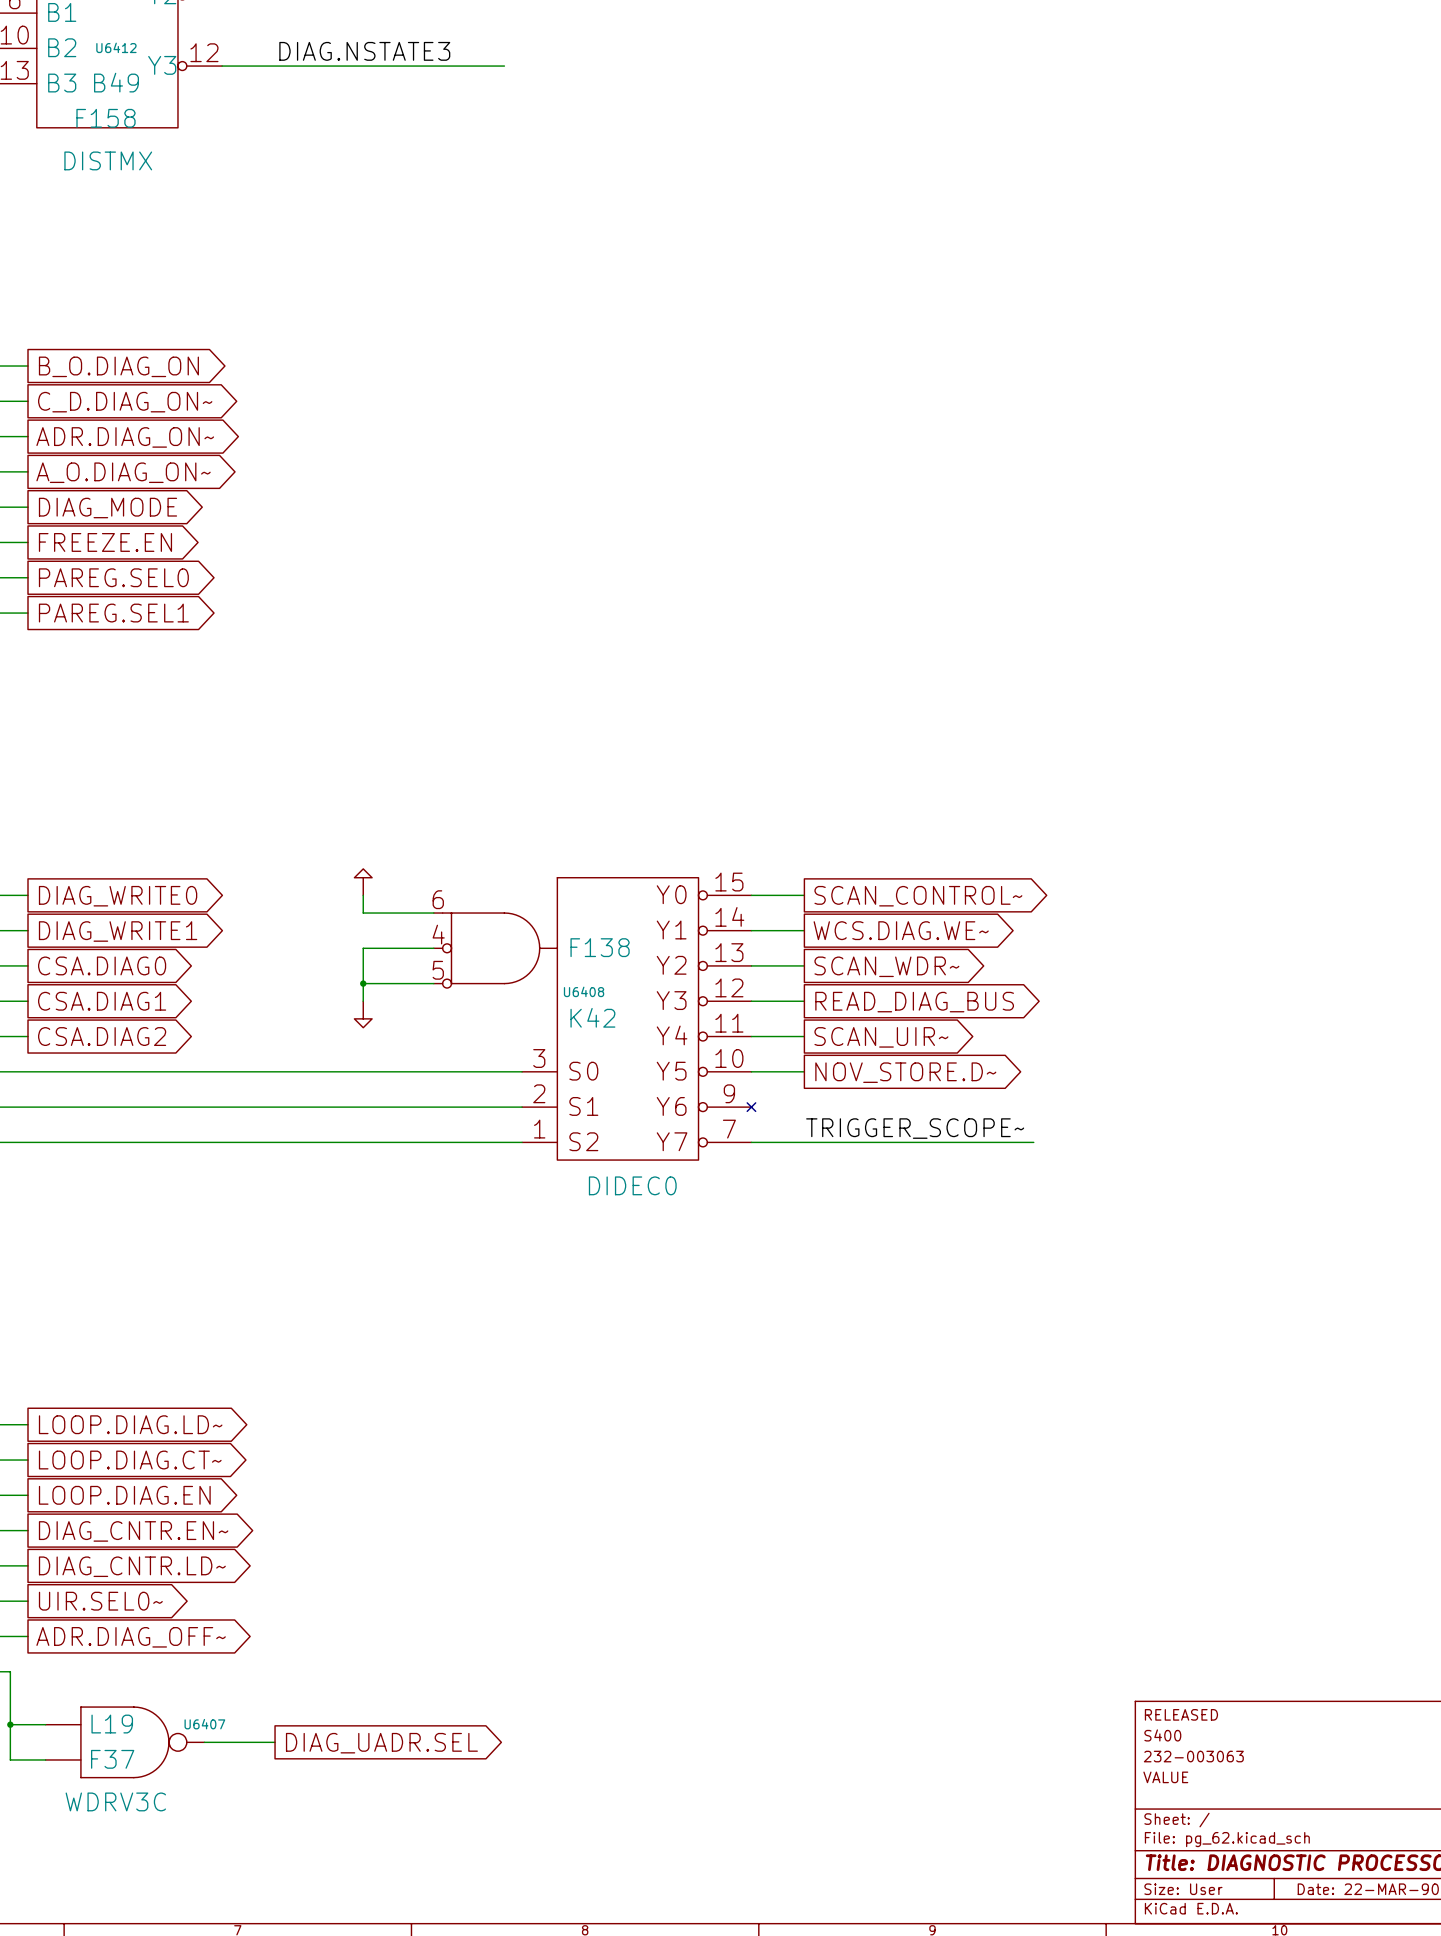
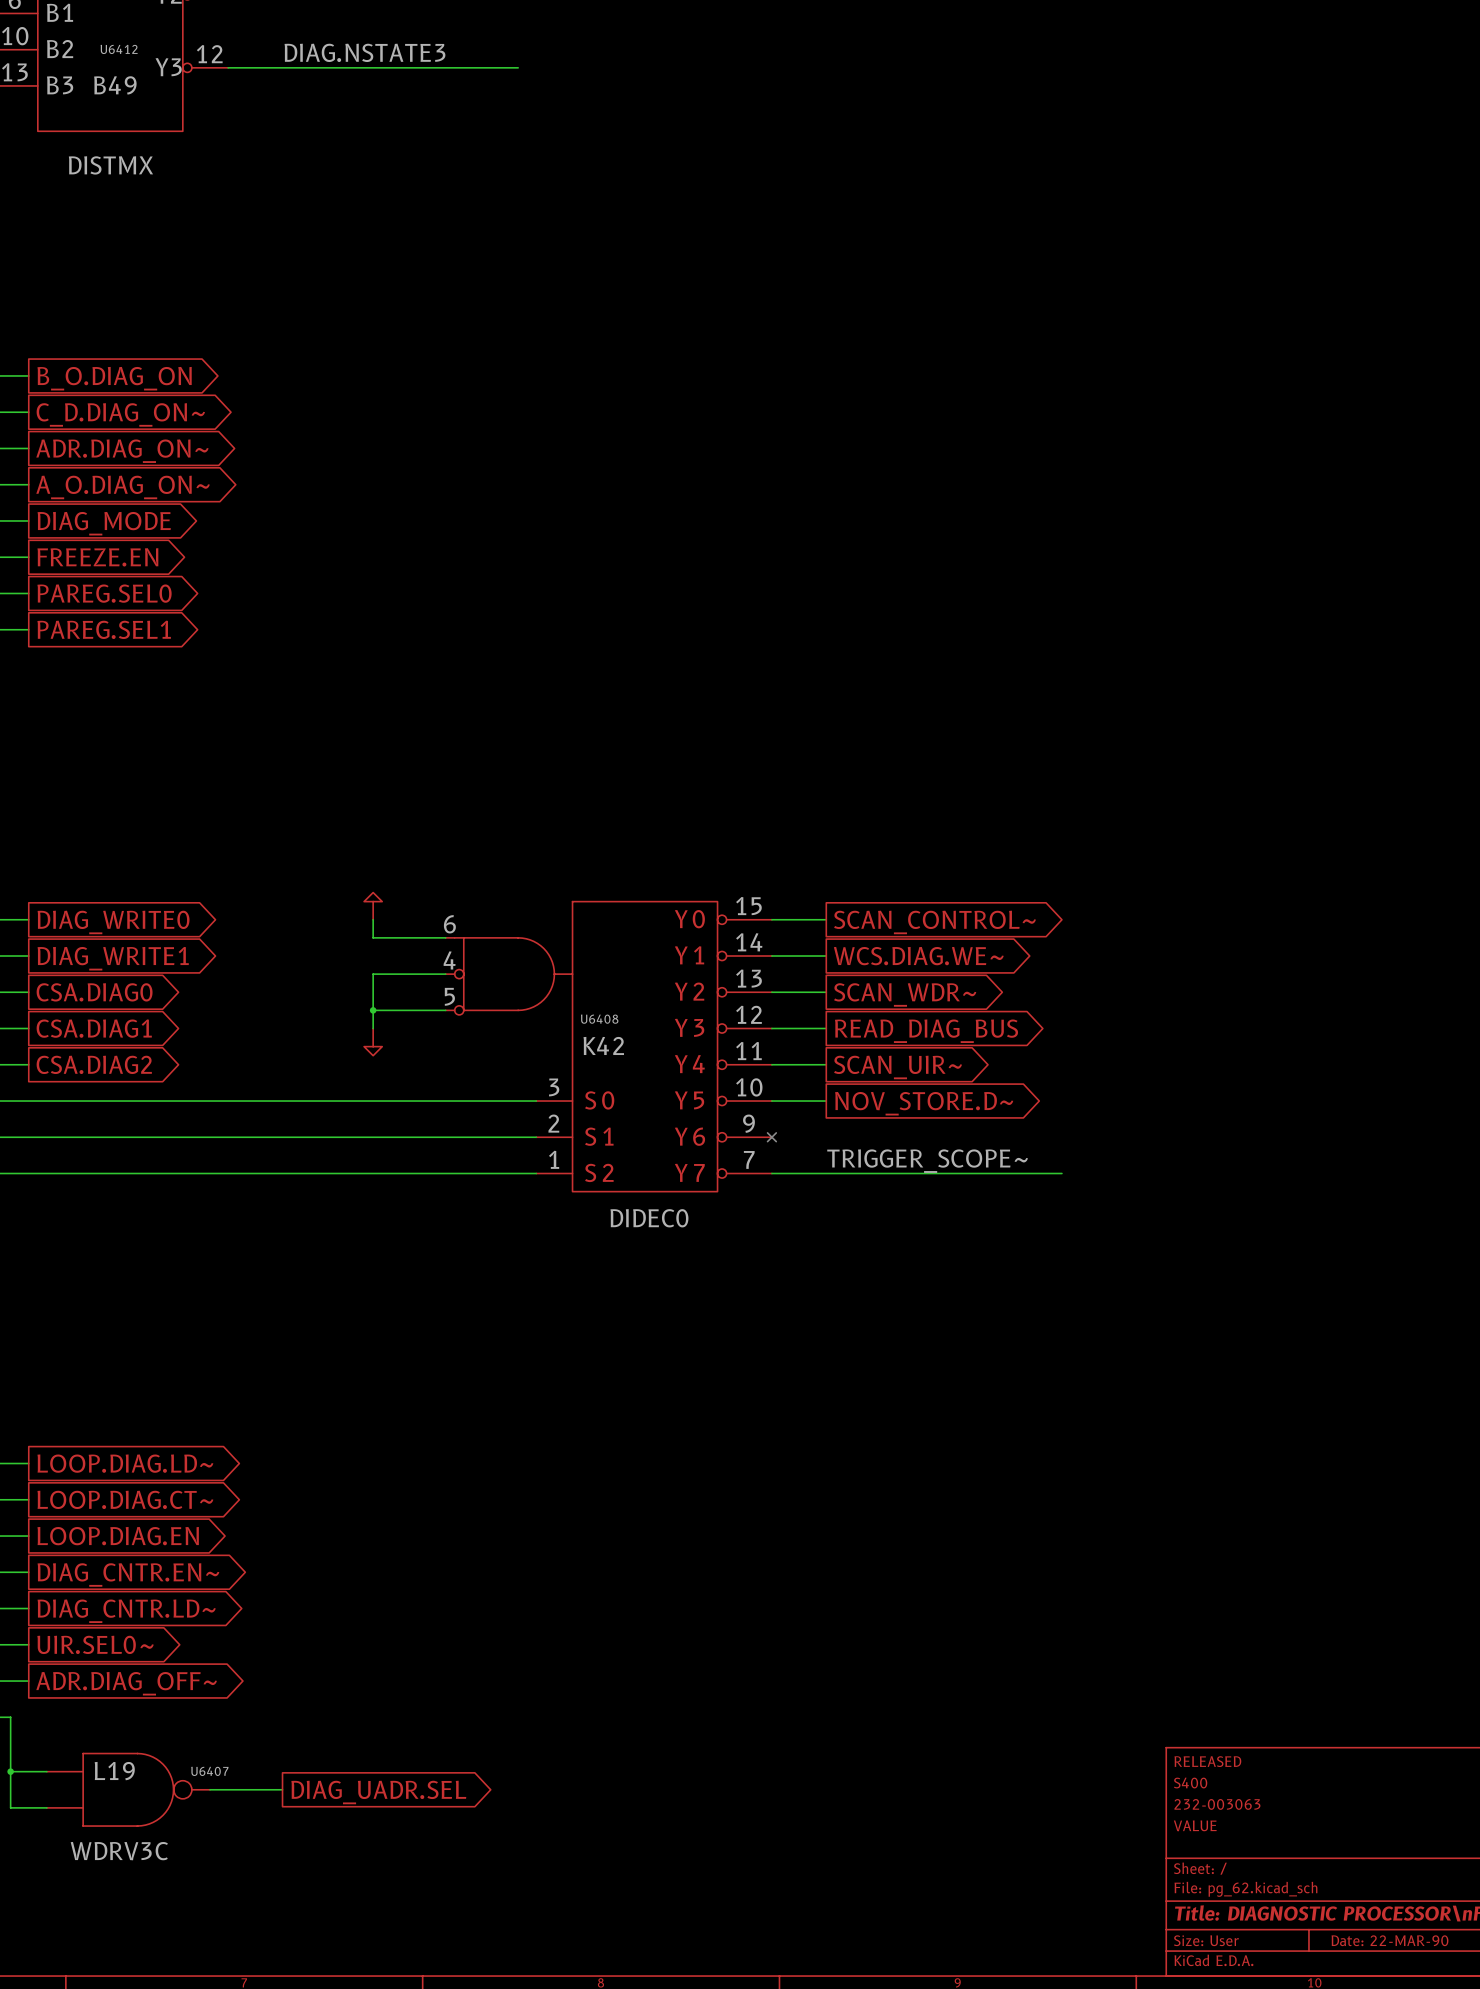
U6412 value: F158 (106, 118) -> none
U6408 value: F138 (600, 947) -> none
U6407 value: F37 (112, 1759) -> none

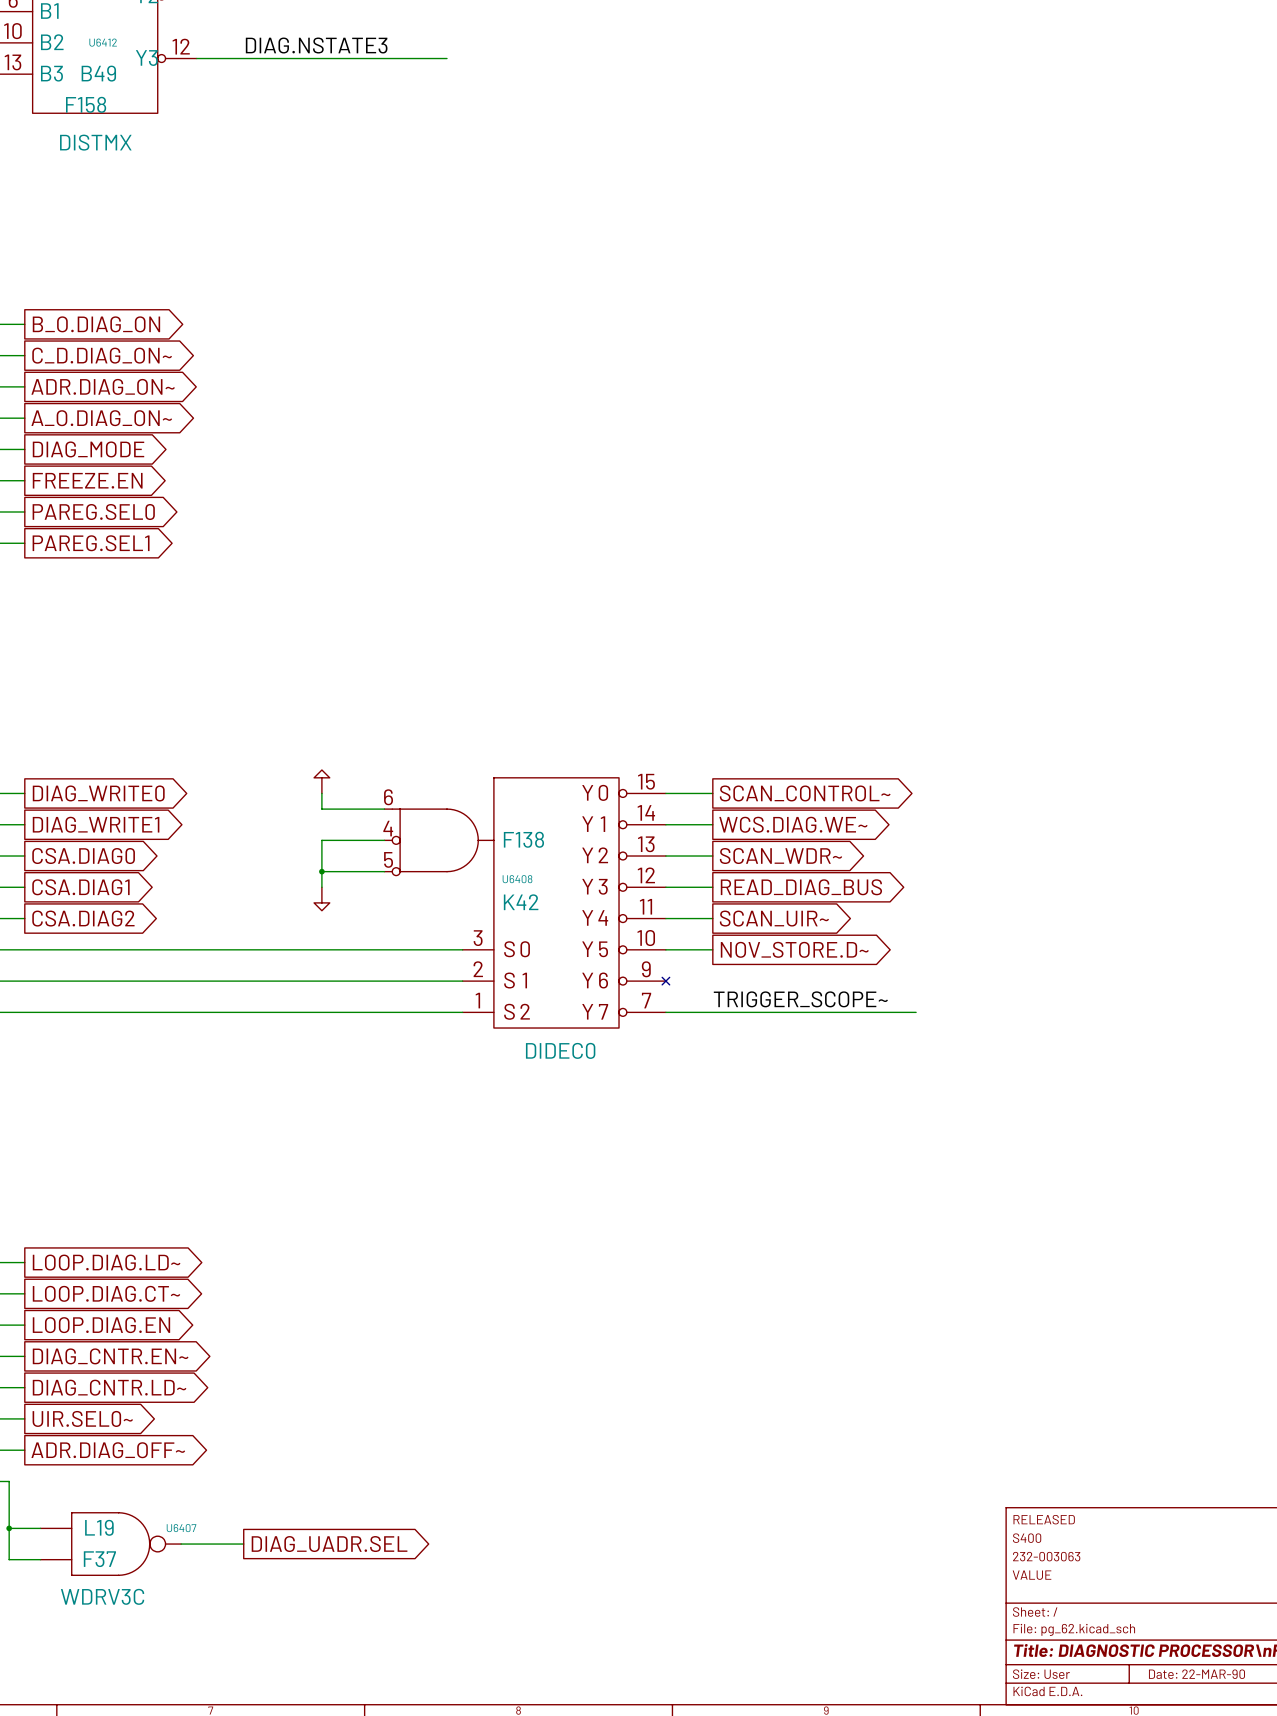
U6412 value: none -> F158 (86, 104)
U6408 value: none -> F138 (523, 839)
U6407 value: none -> F37 (99, 1559)

